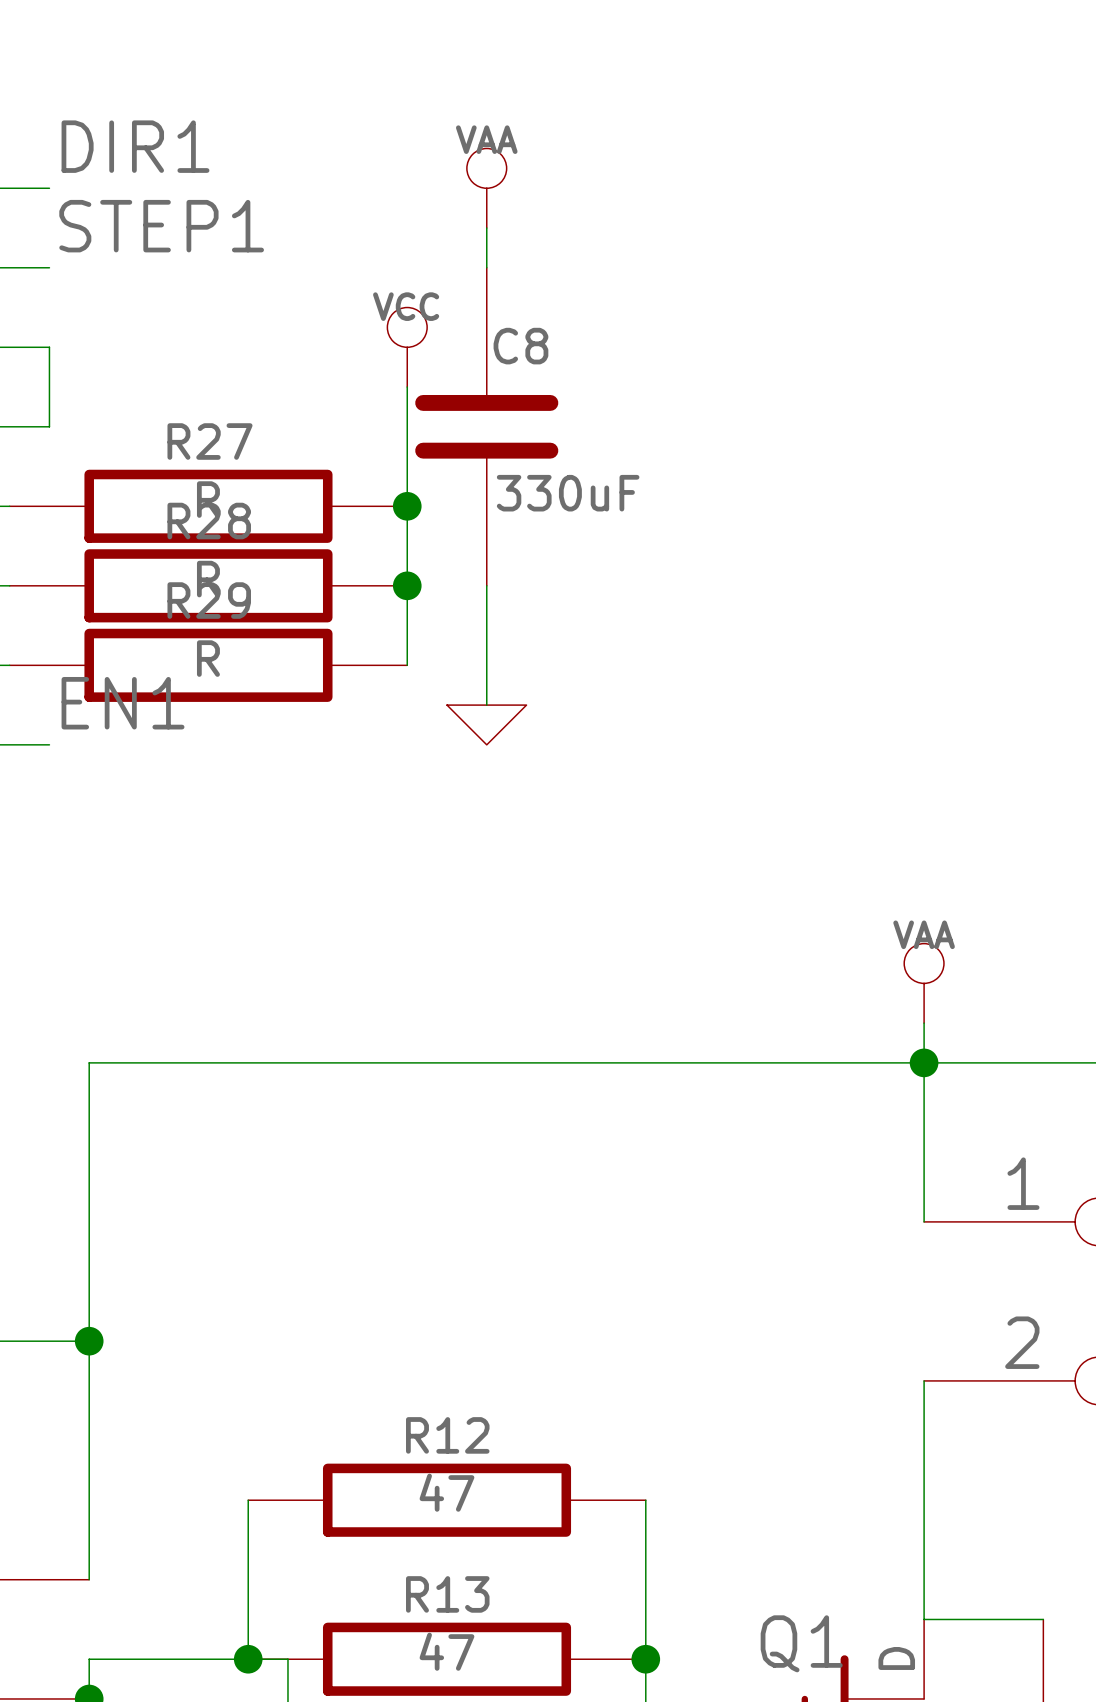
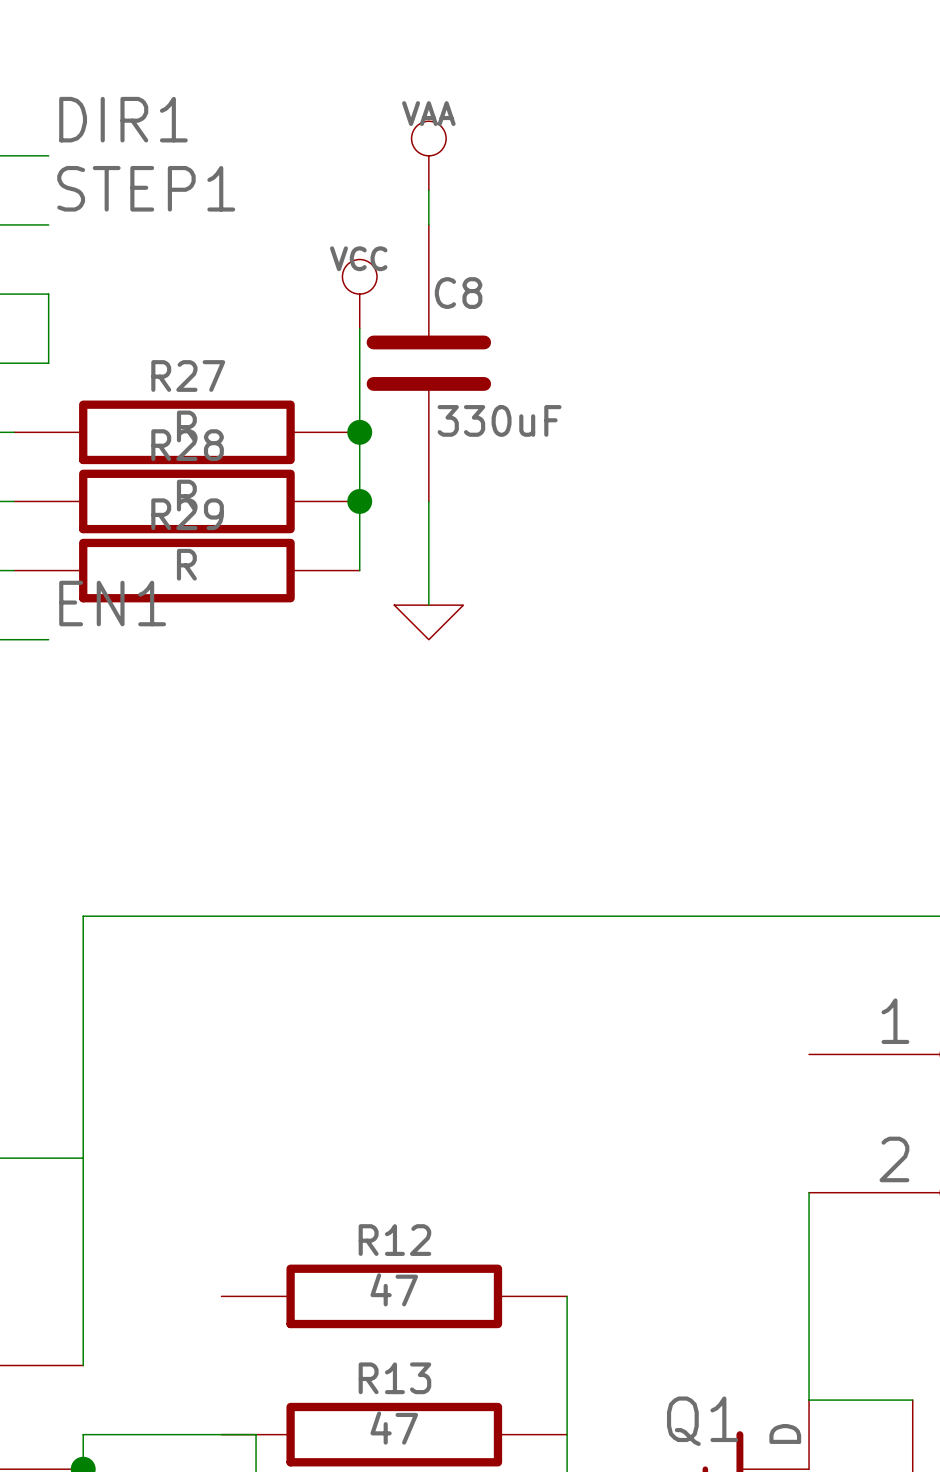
power symbol: VAA (924, 983) -> none
wire: (924, 1023) (924, 1221) -> none
junction: (924, 1062) -> none
junction: (89, 1341) -> none
wire: (248, 1500) (248, 1659) -> none
junction: (248, 1659) -> none
junction: (645, 1659) -> none

